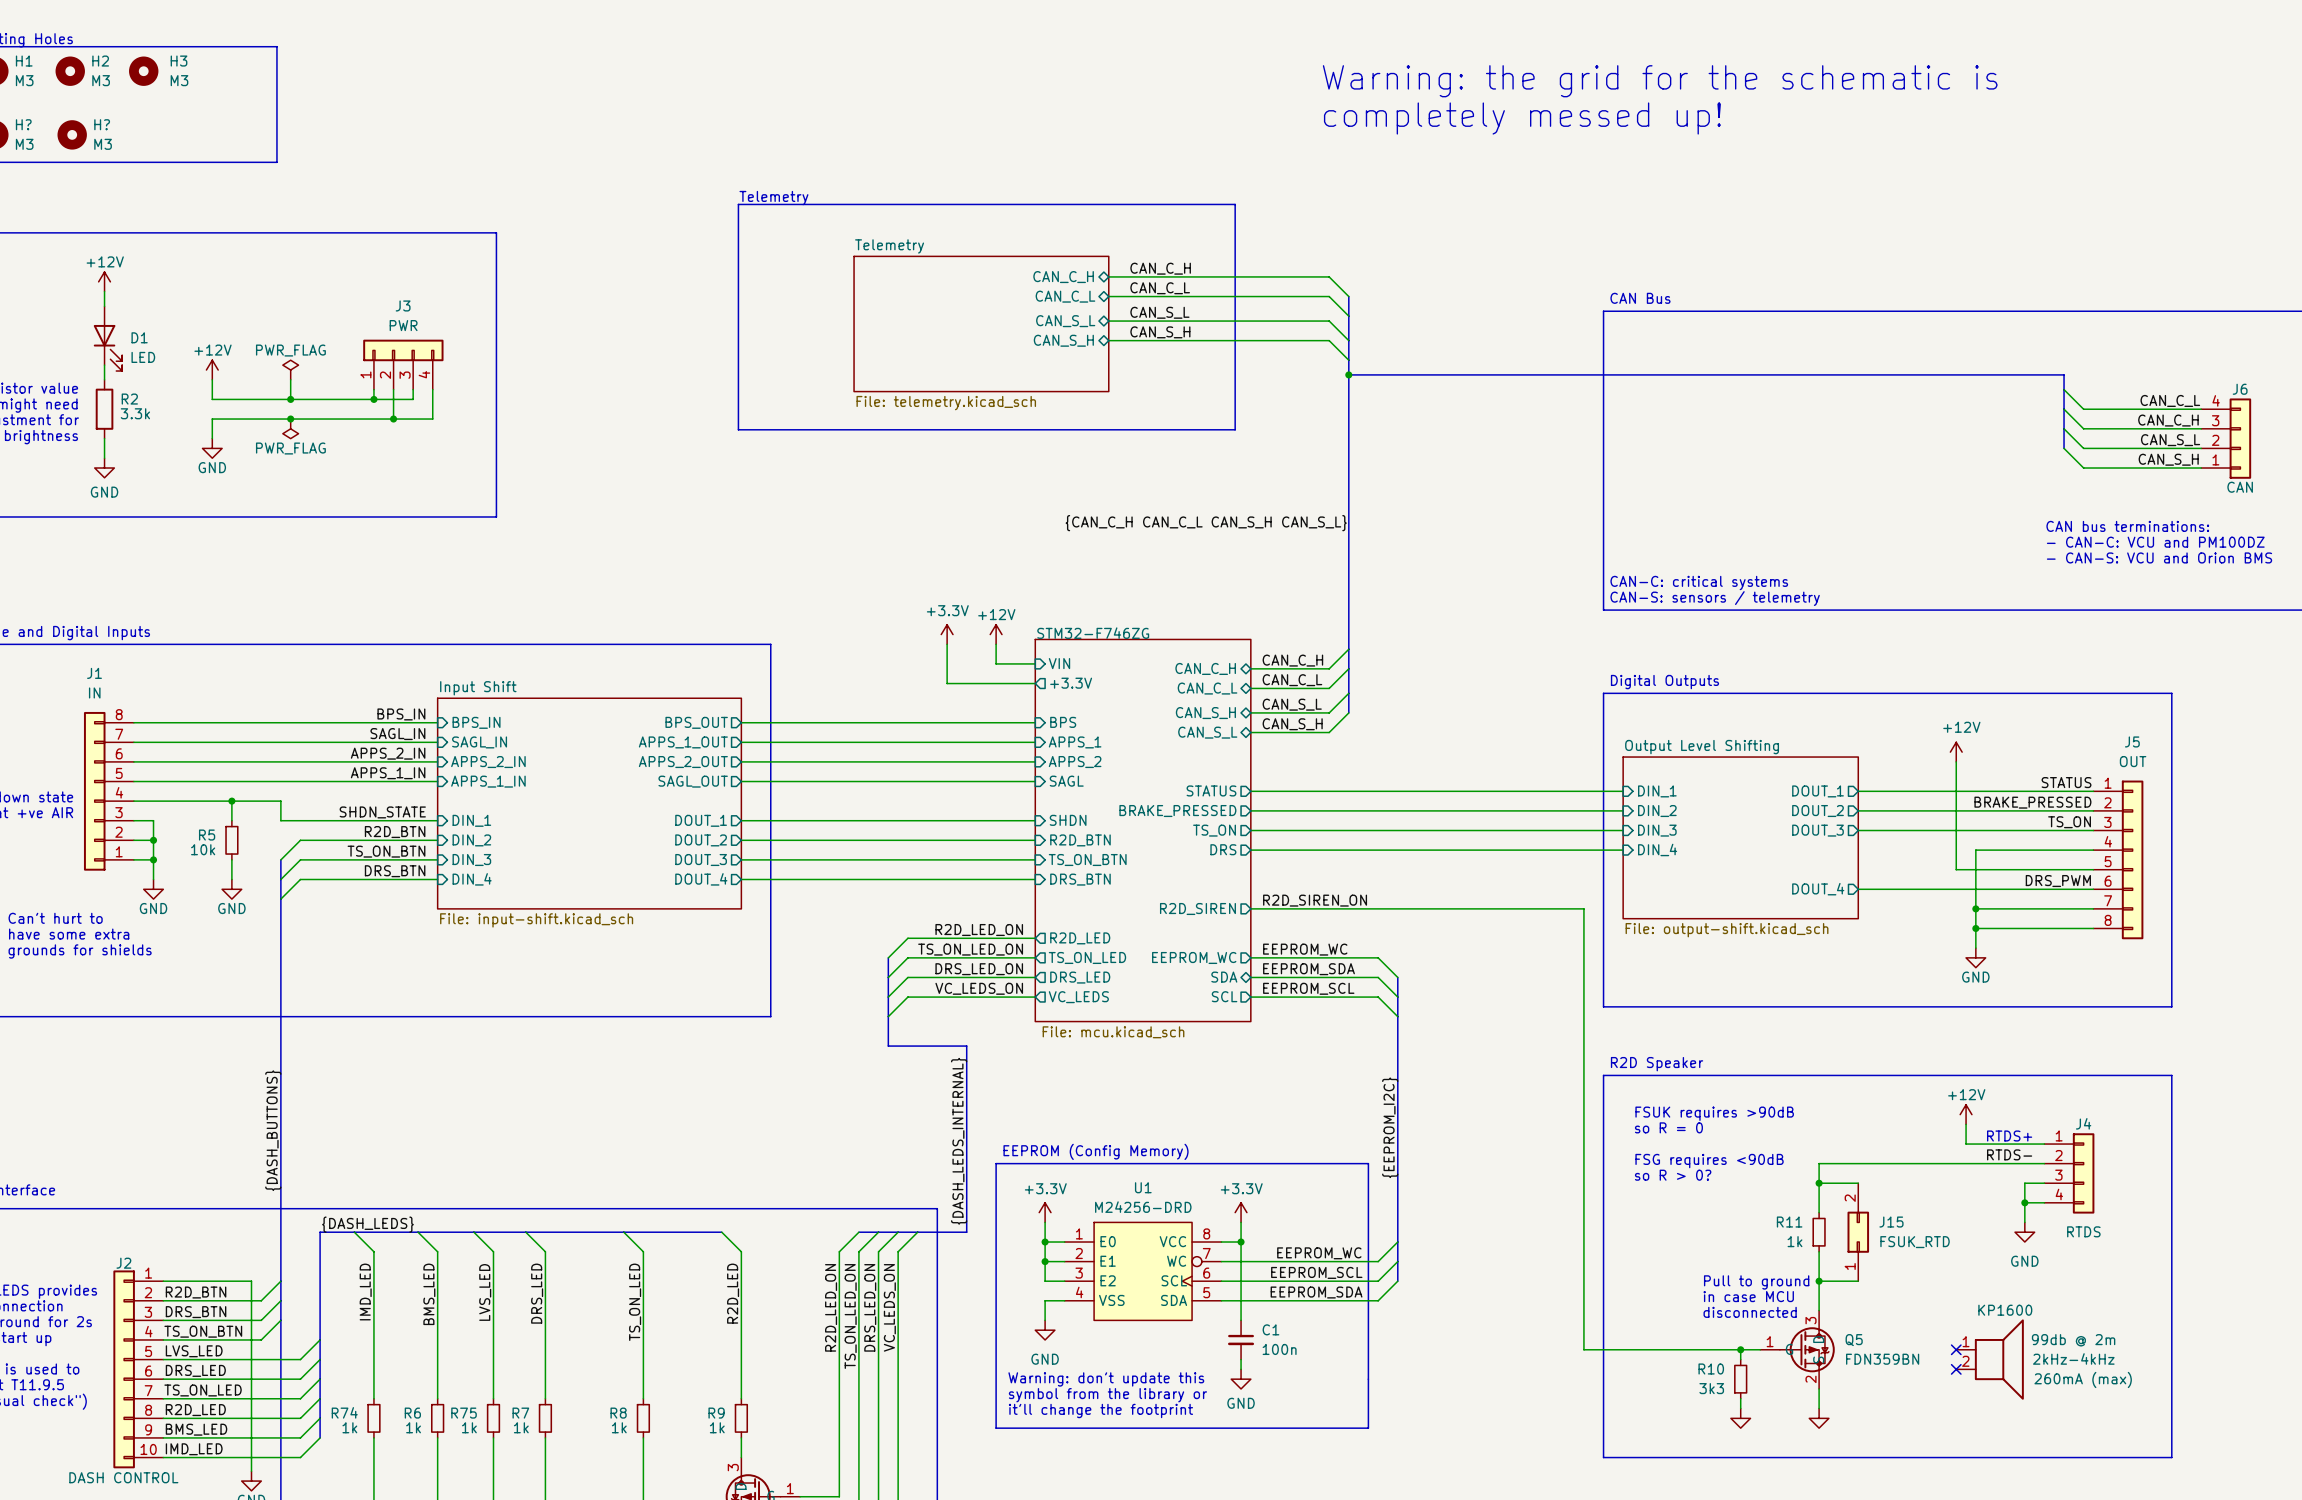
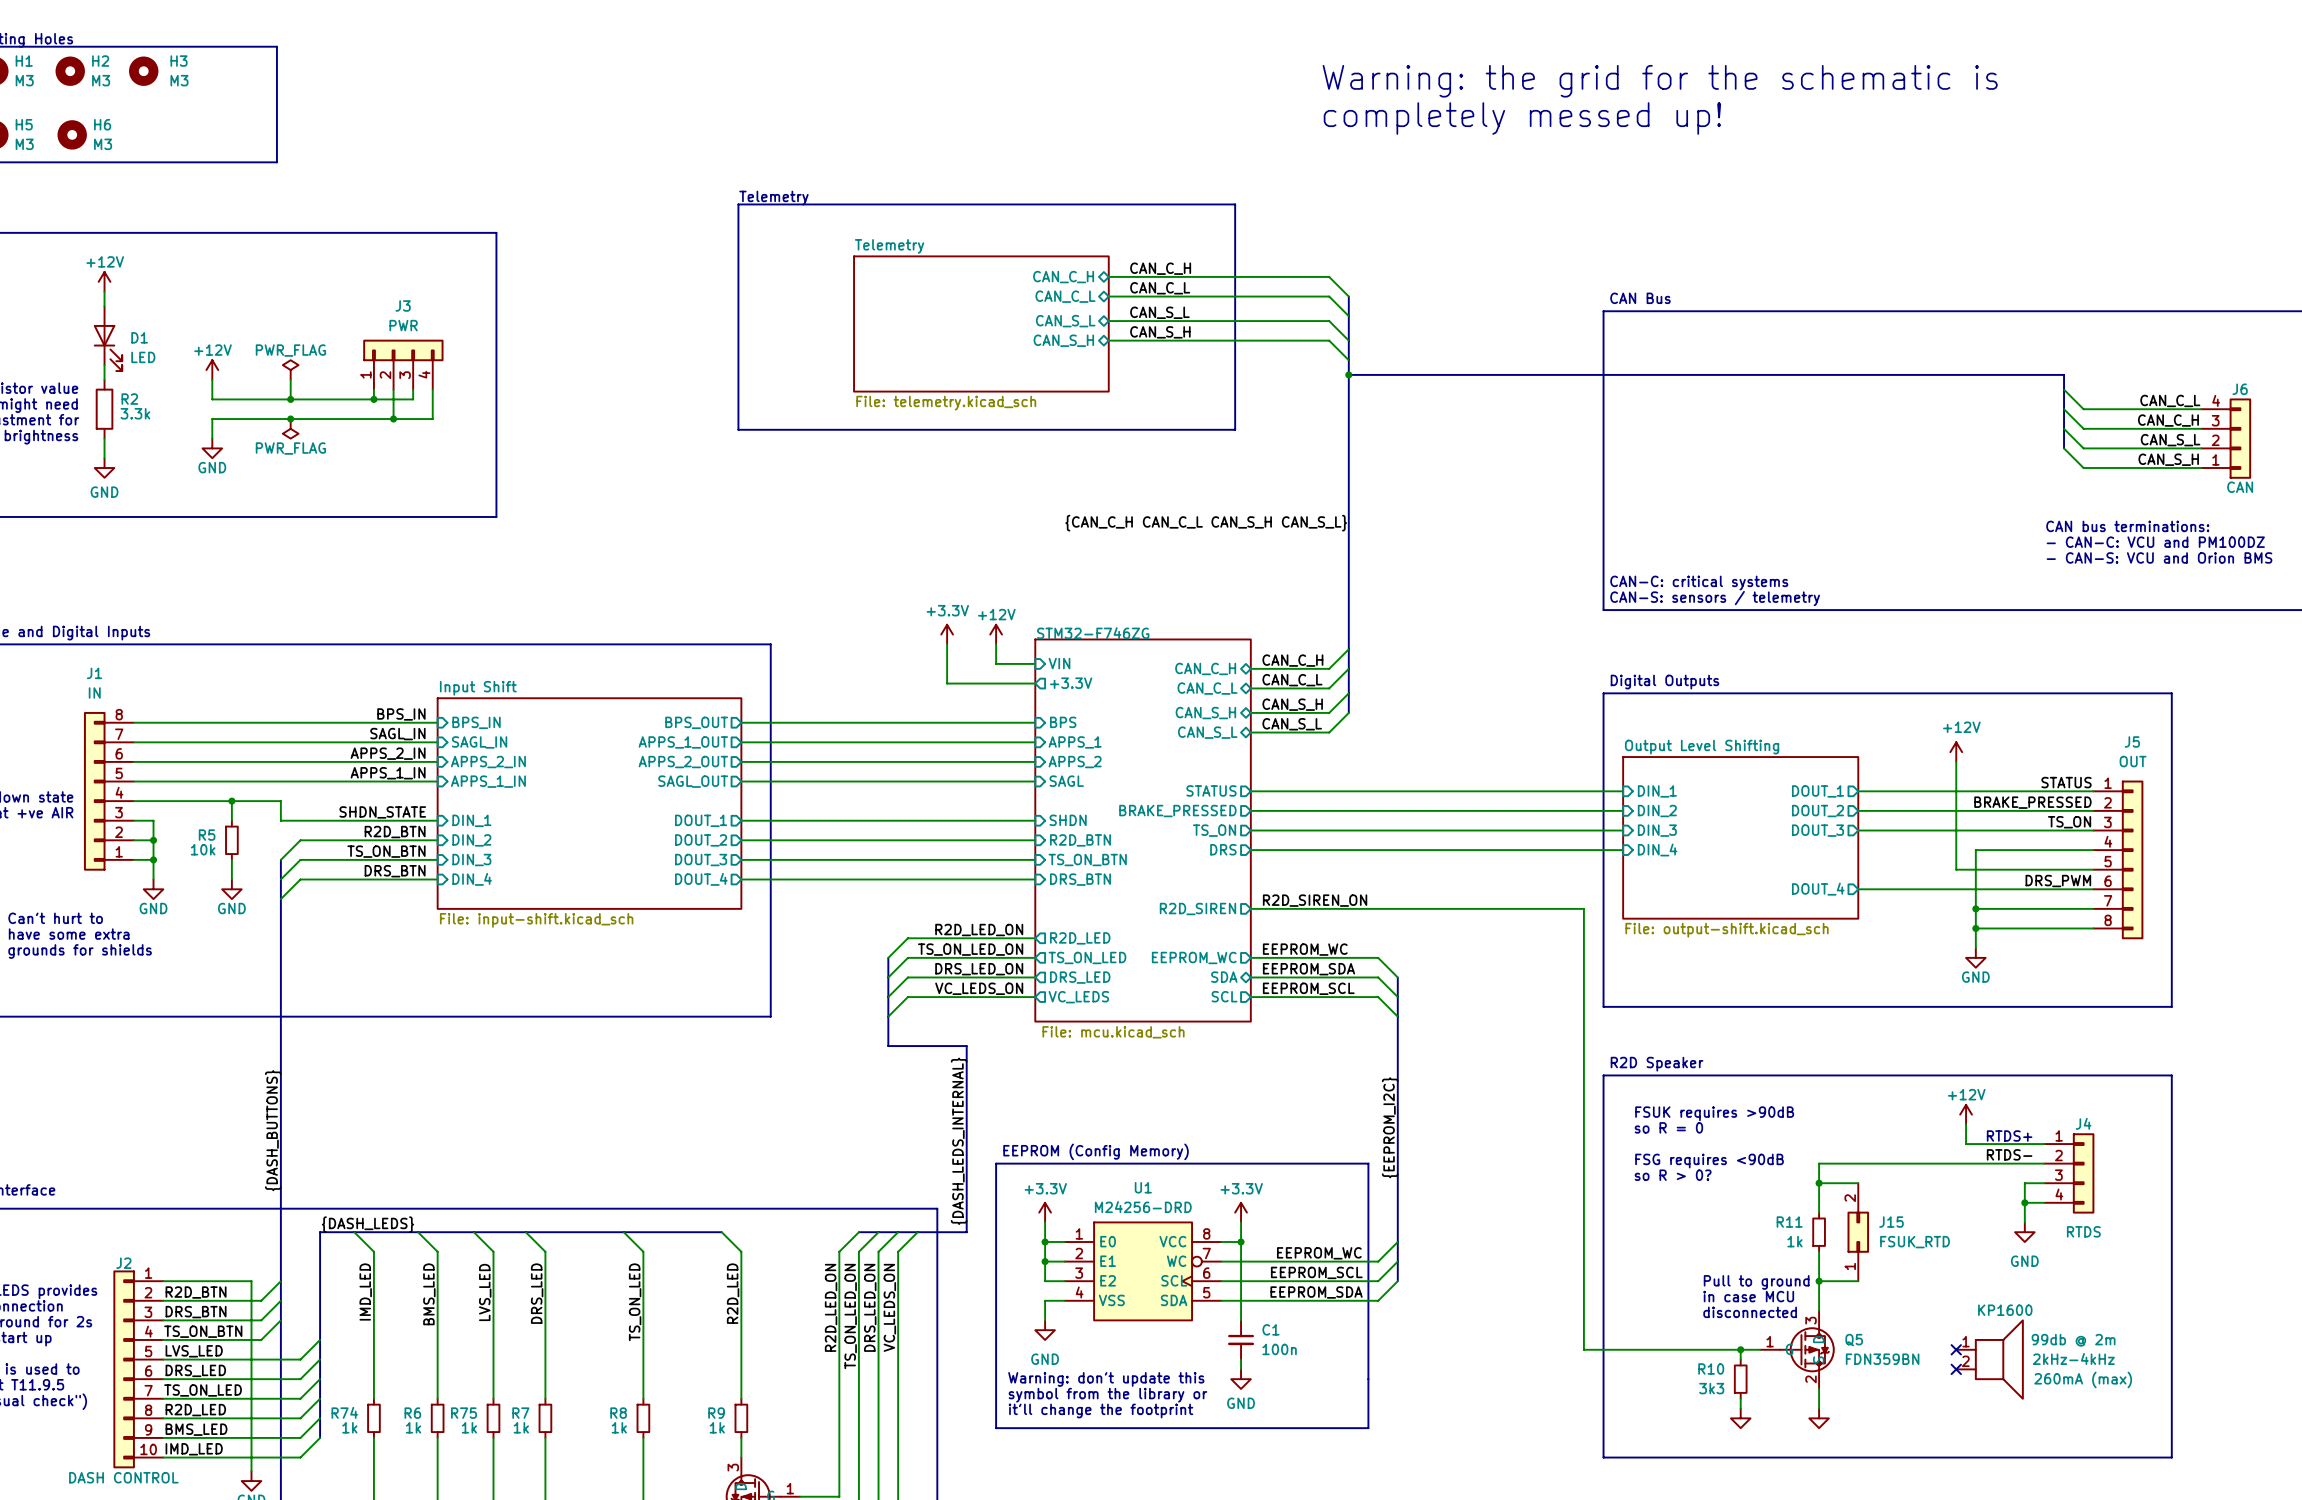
H? name: H? (23, 124) -> H5 (24, 124)
H? name: H? (102, 124) -> H6 (102, 124)
label: CAN_S_L (1292, 704) -> CAN_S_H (1292, 704)
label: CAN_S_H (1292, 724) -> CAN_S_L (1292, 724)

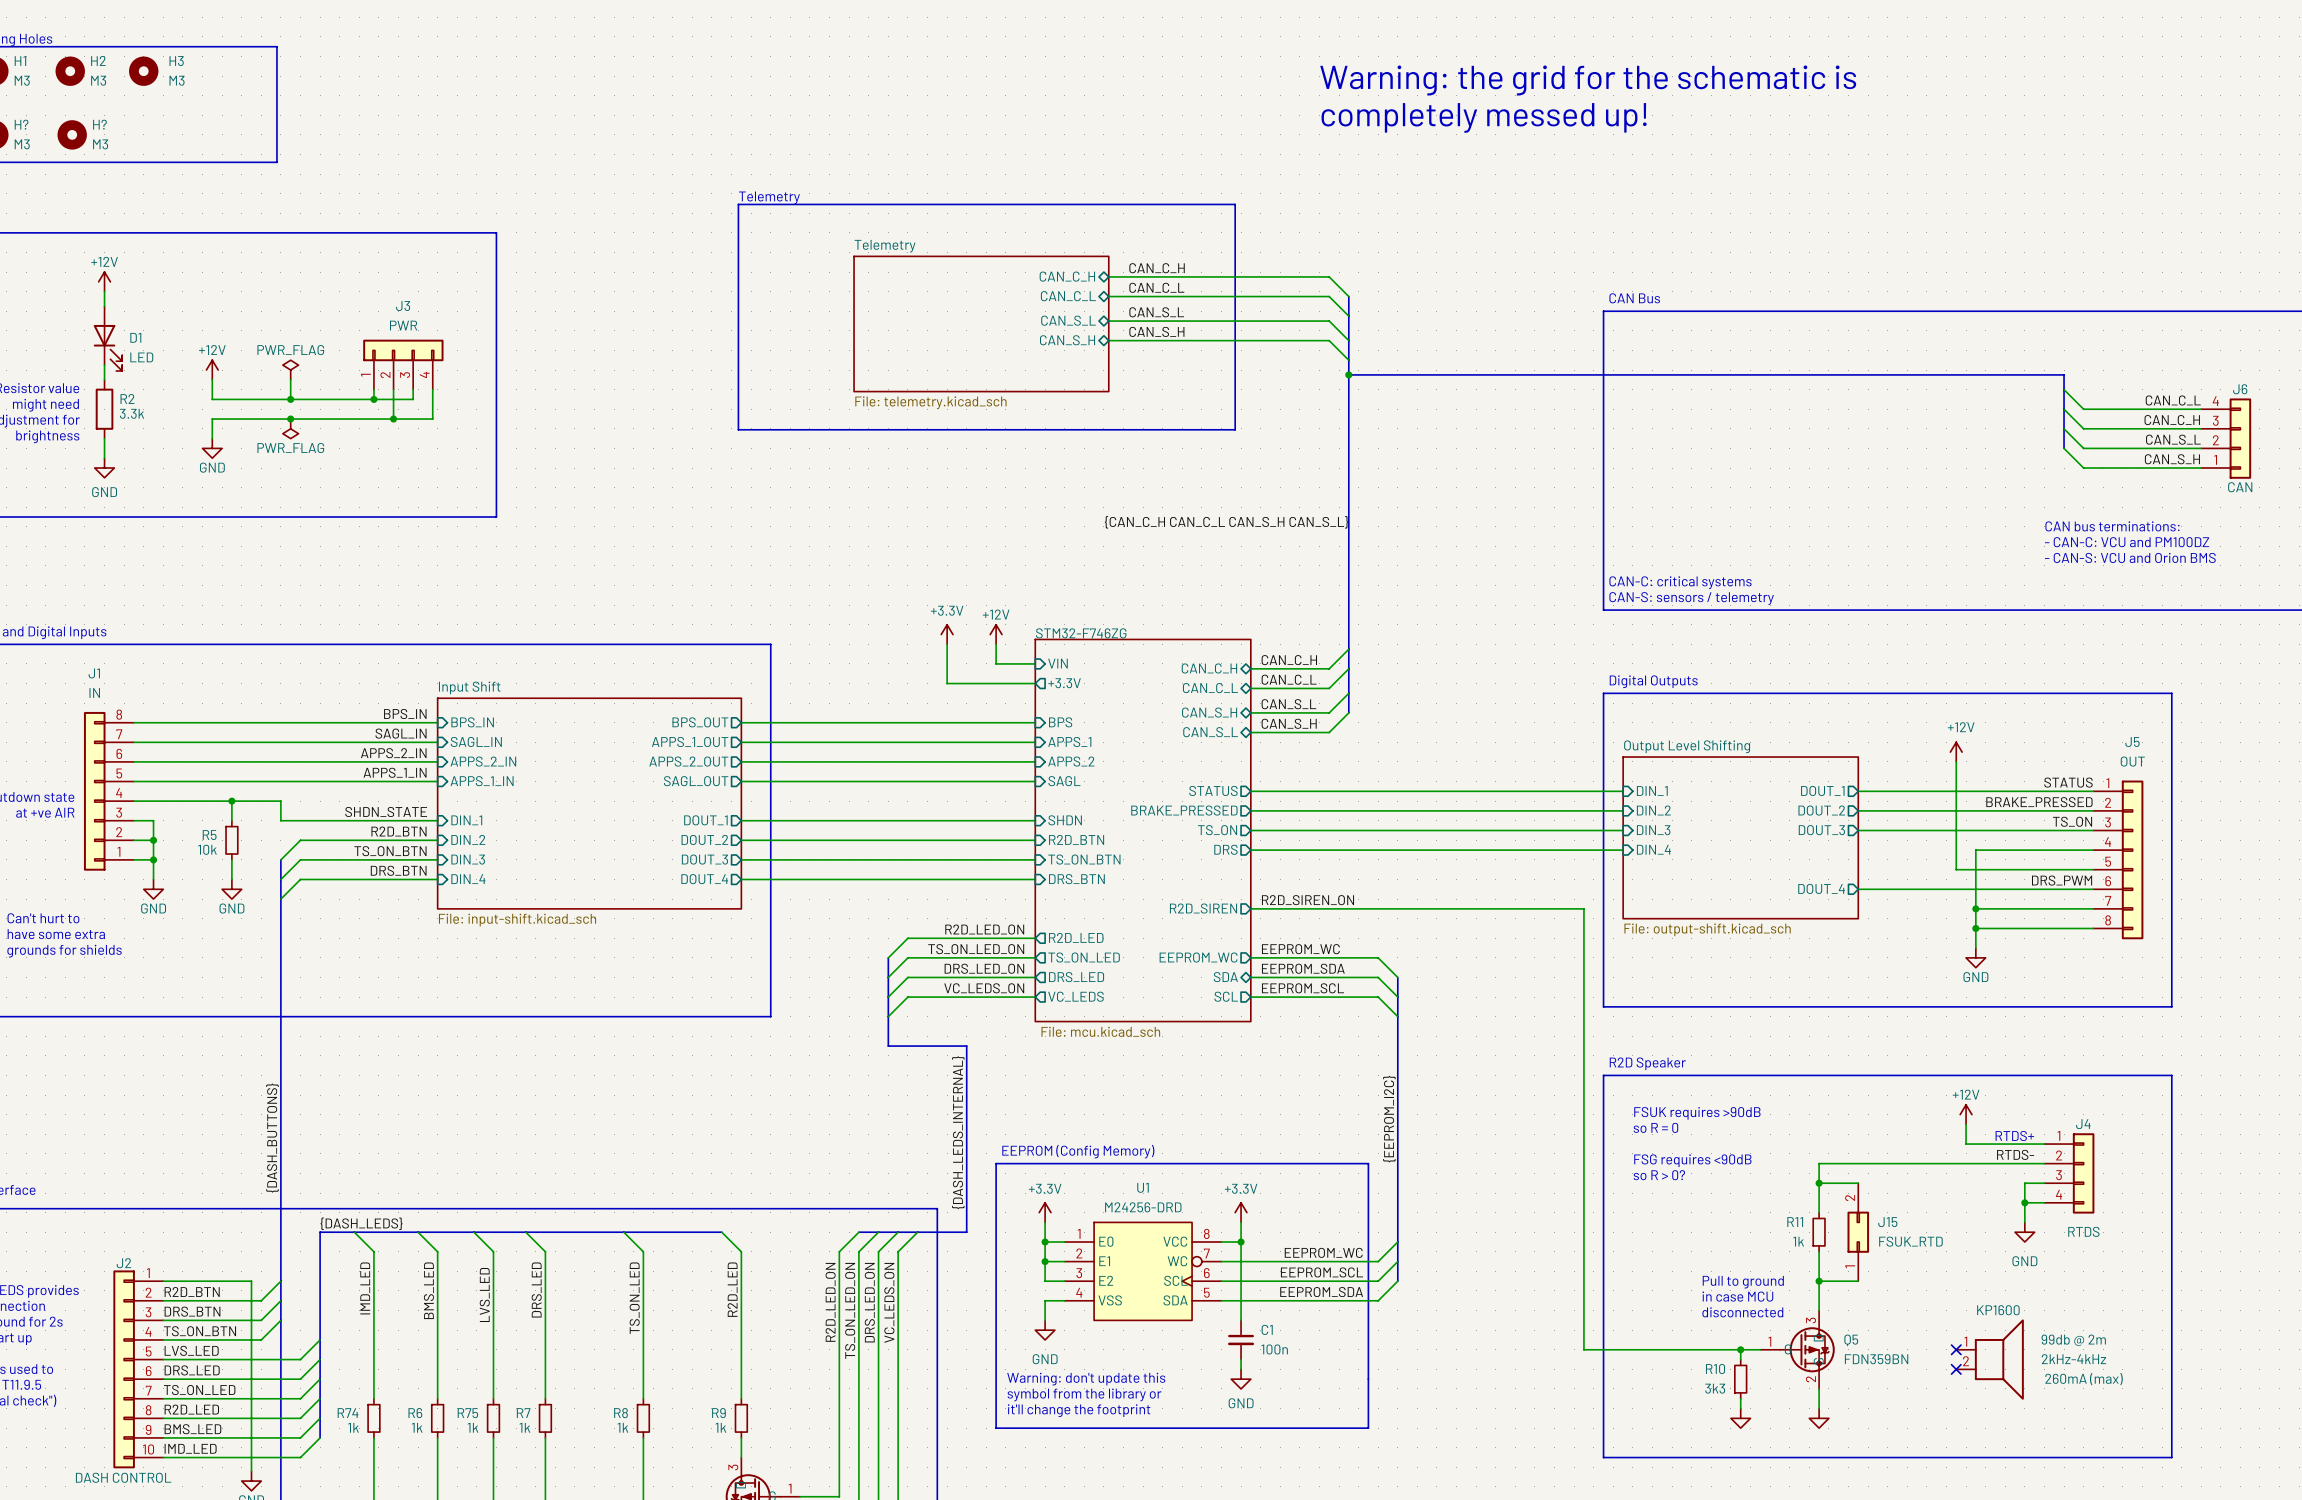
H5 name: H5 (24, 124) -> H? (21, 124)
H6 name: H6 (102, 124) -> H? (99, 124)
label: CAN_S_H (1292, 704) -> CAN_S_L (1288, 704)
label: CAN_S_L (1292, 724) -> CAN_S_H (1289, 723)

